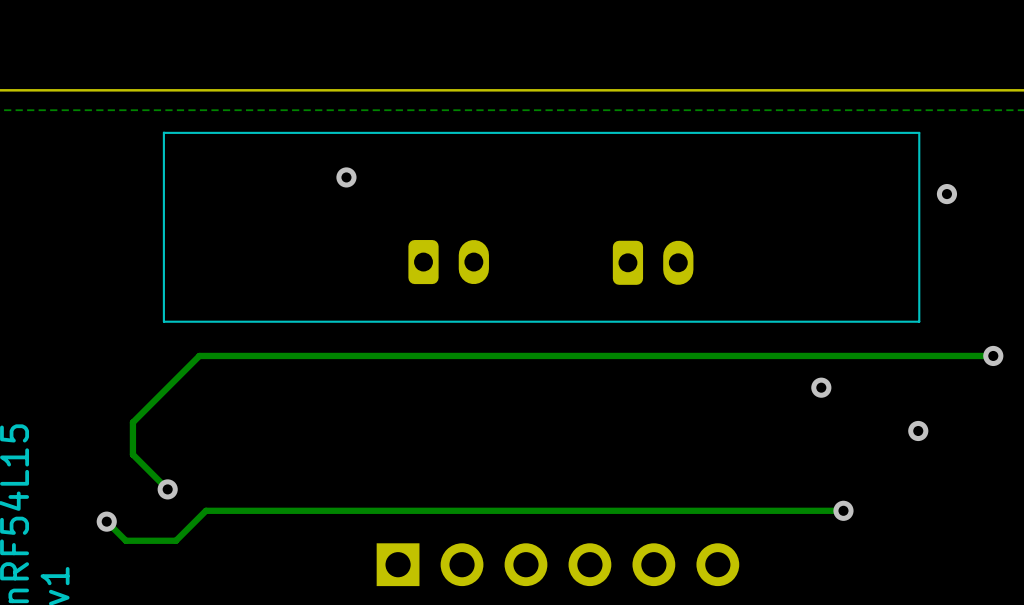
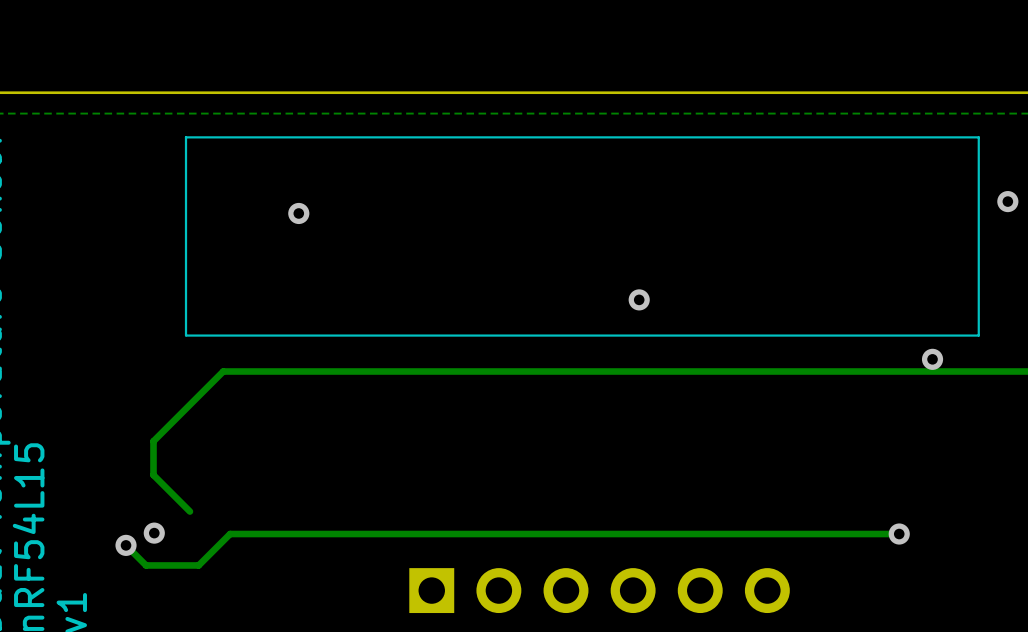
via position: (346, 177) -> (298, 213)
part: (448, 262) -> none
part: (653, 262) -> none
via: none -> (639, 299)
via: none -> (932, 359)
via: (821, 387) -> none
via: (918, 430) -> none
via position: (167, 489) -> (154, 533)

